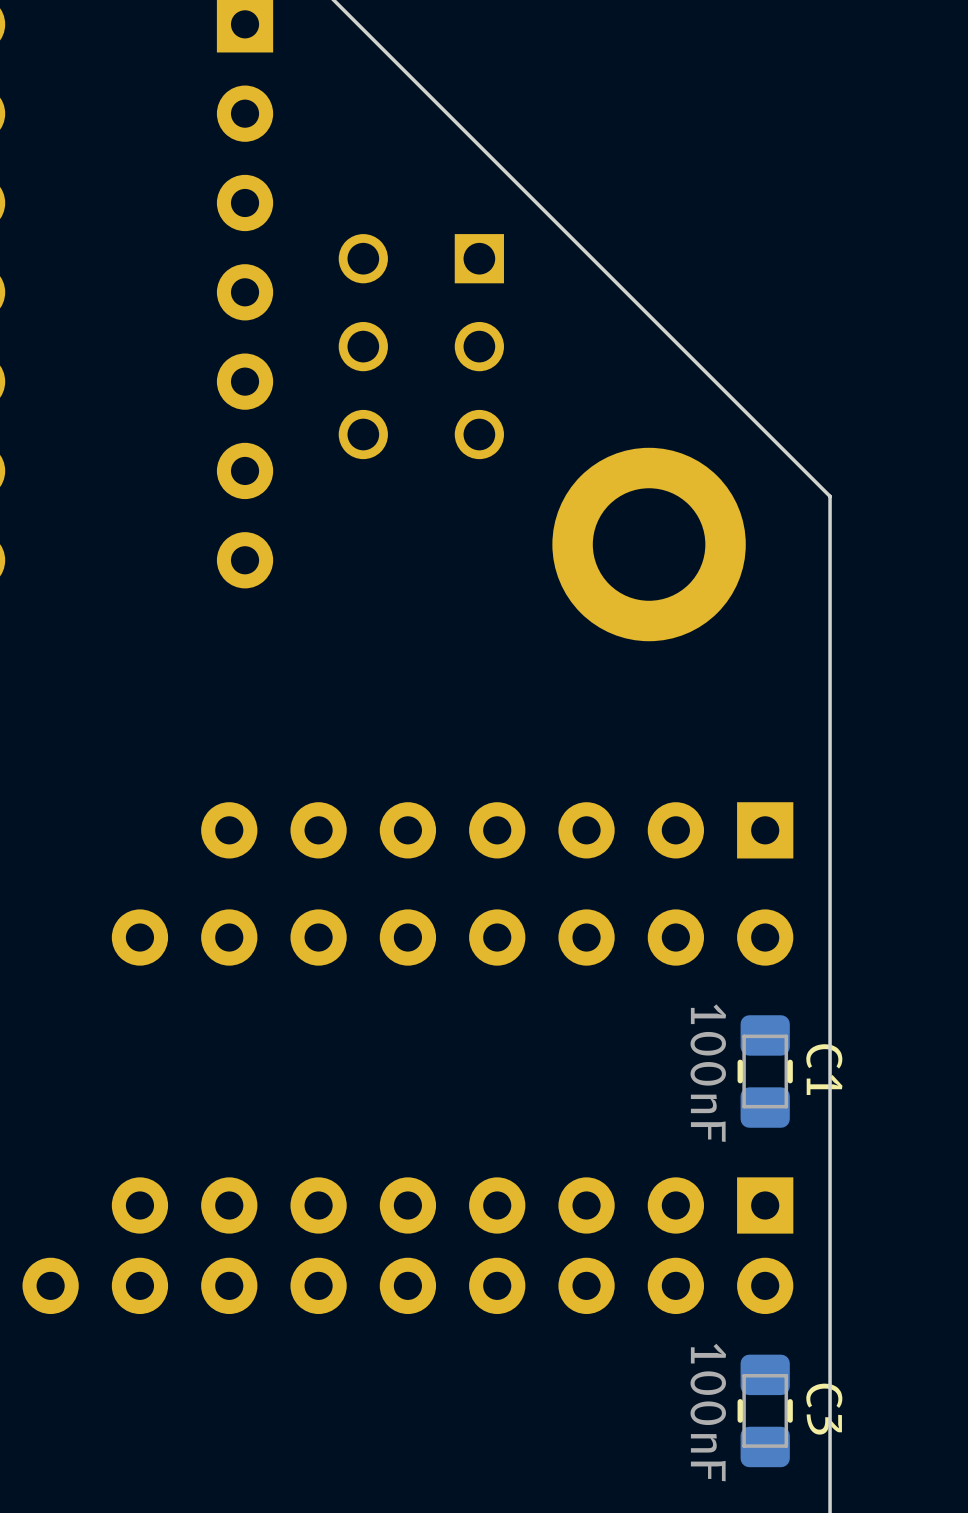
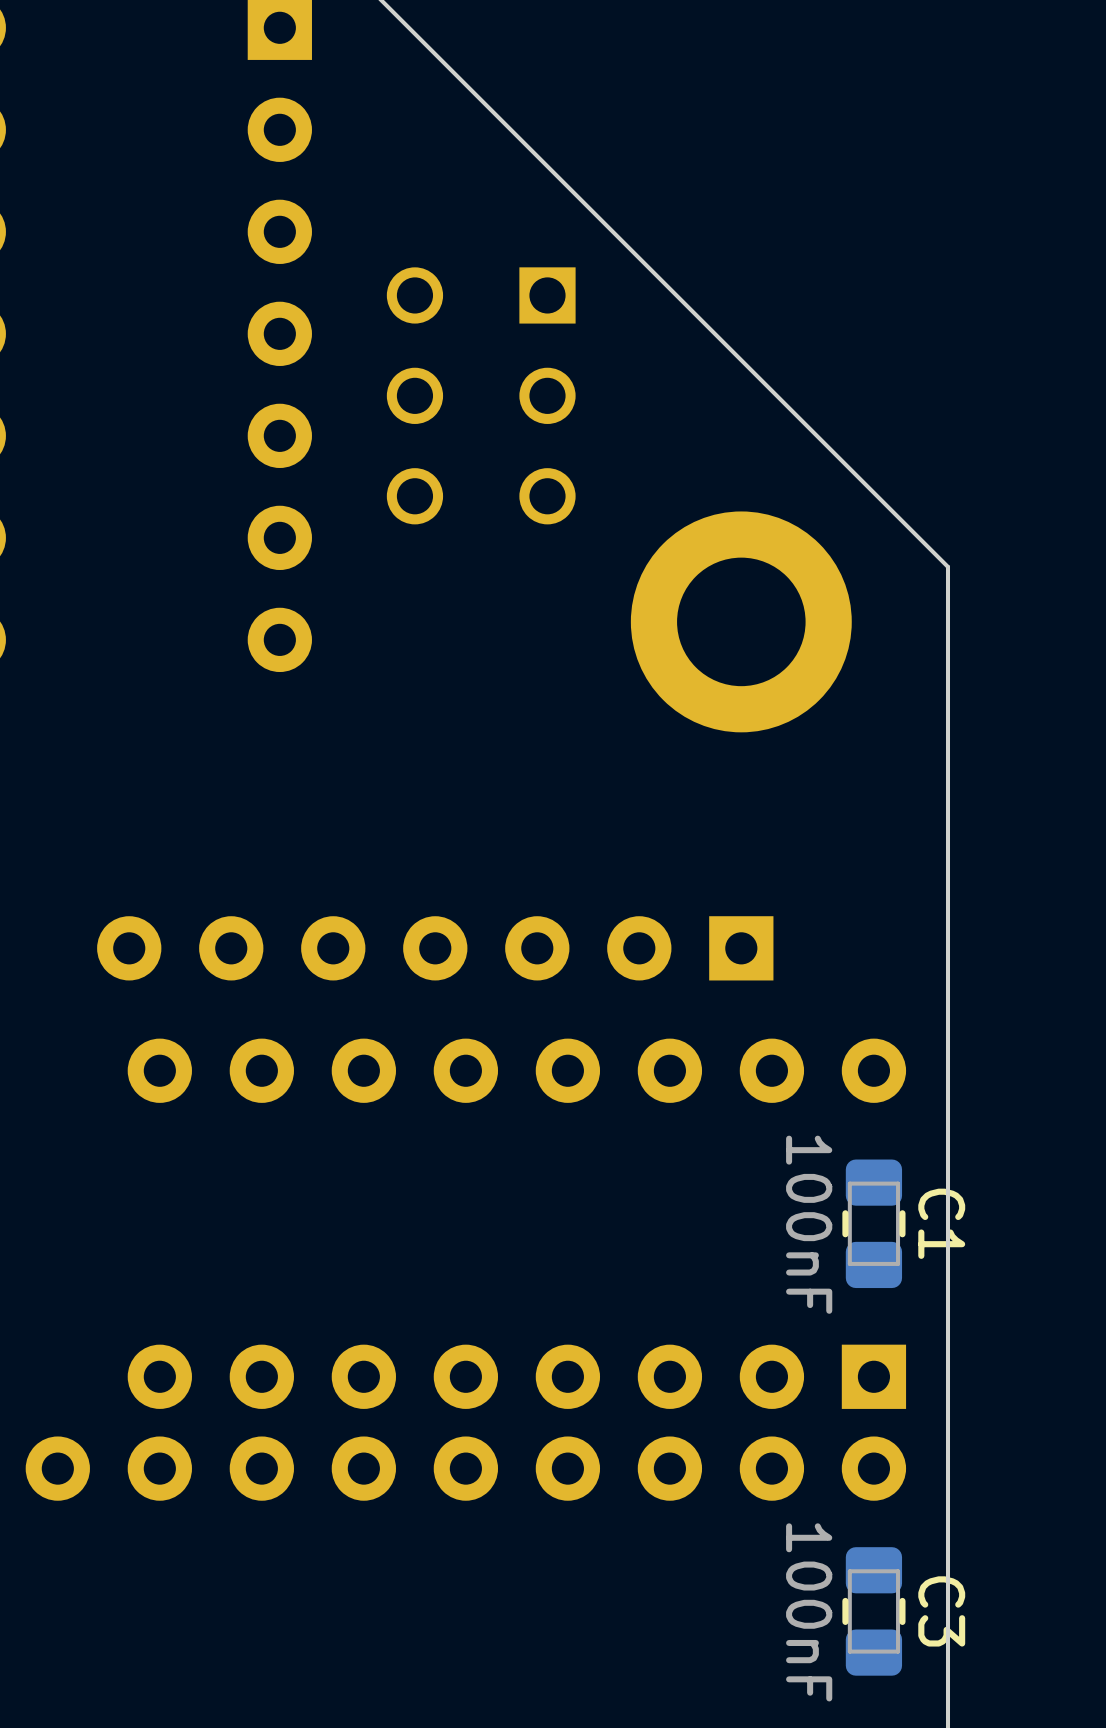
part position: (497, 830) -> (435, 948)

